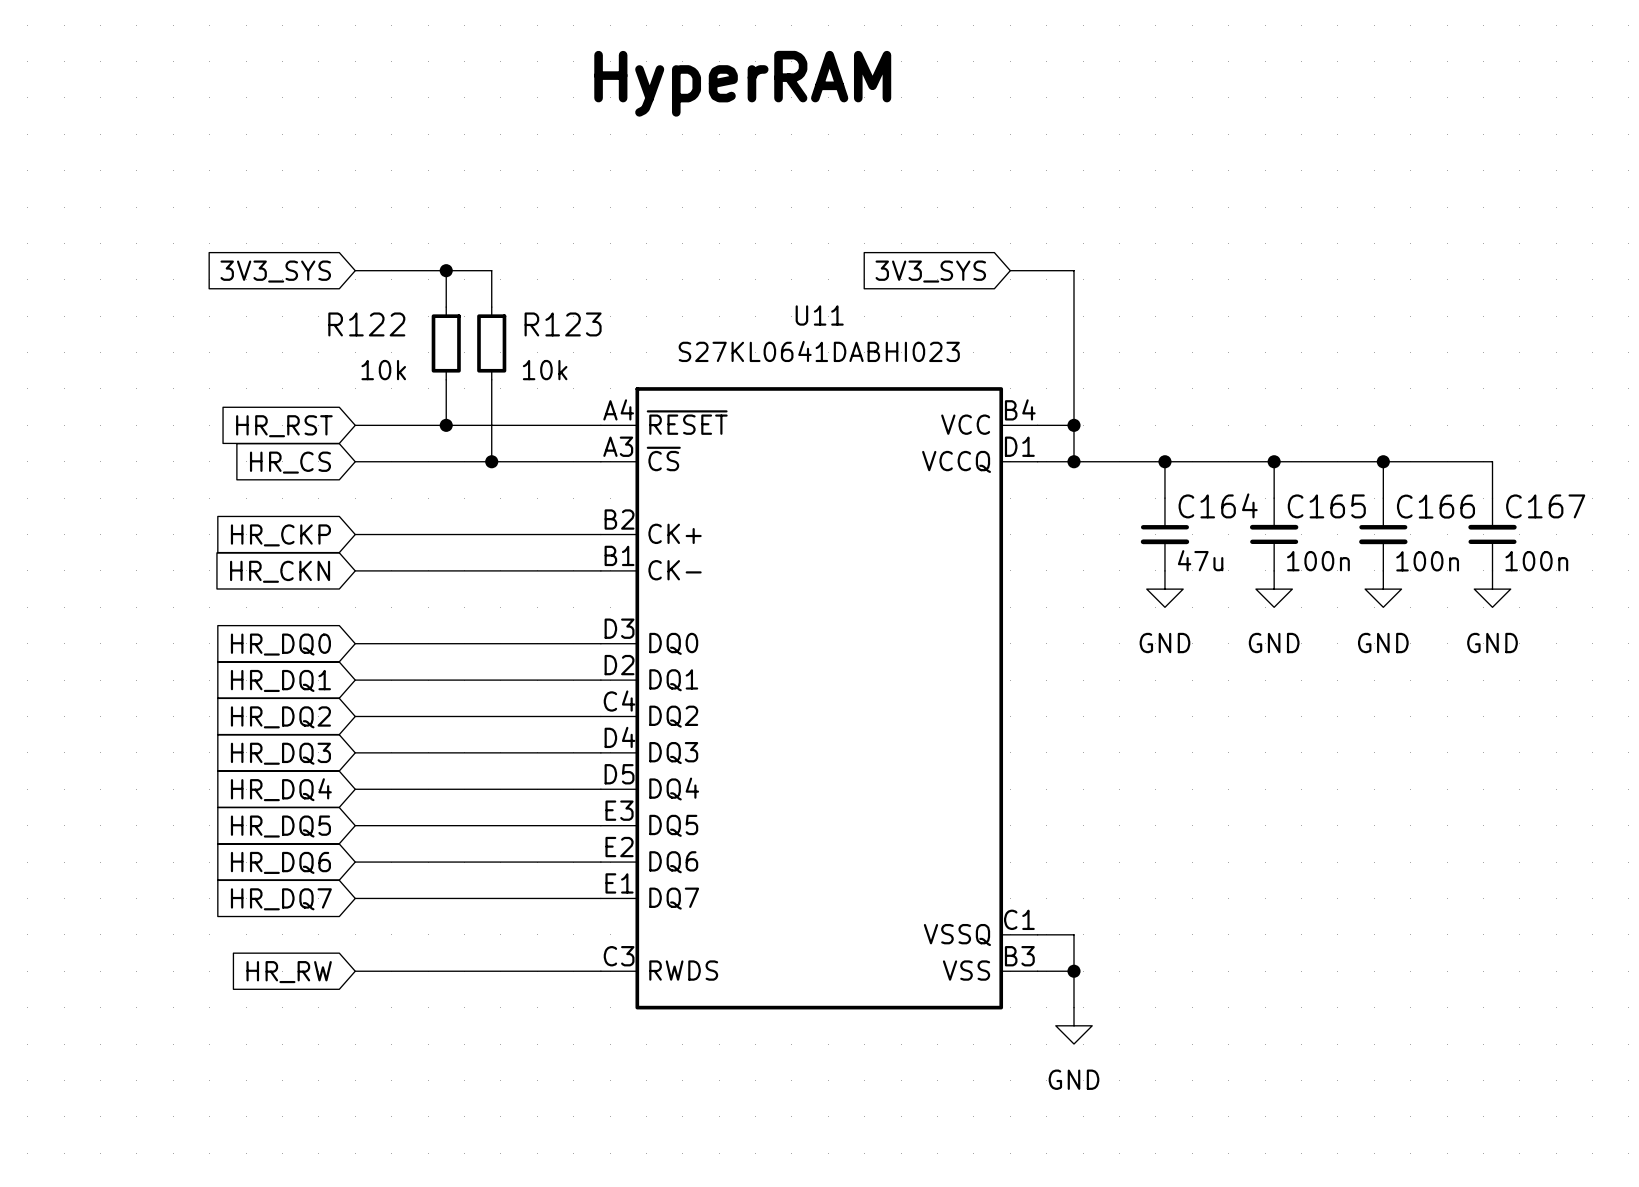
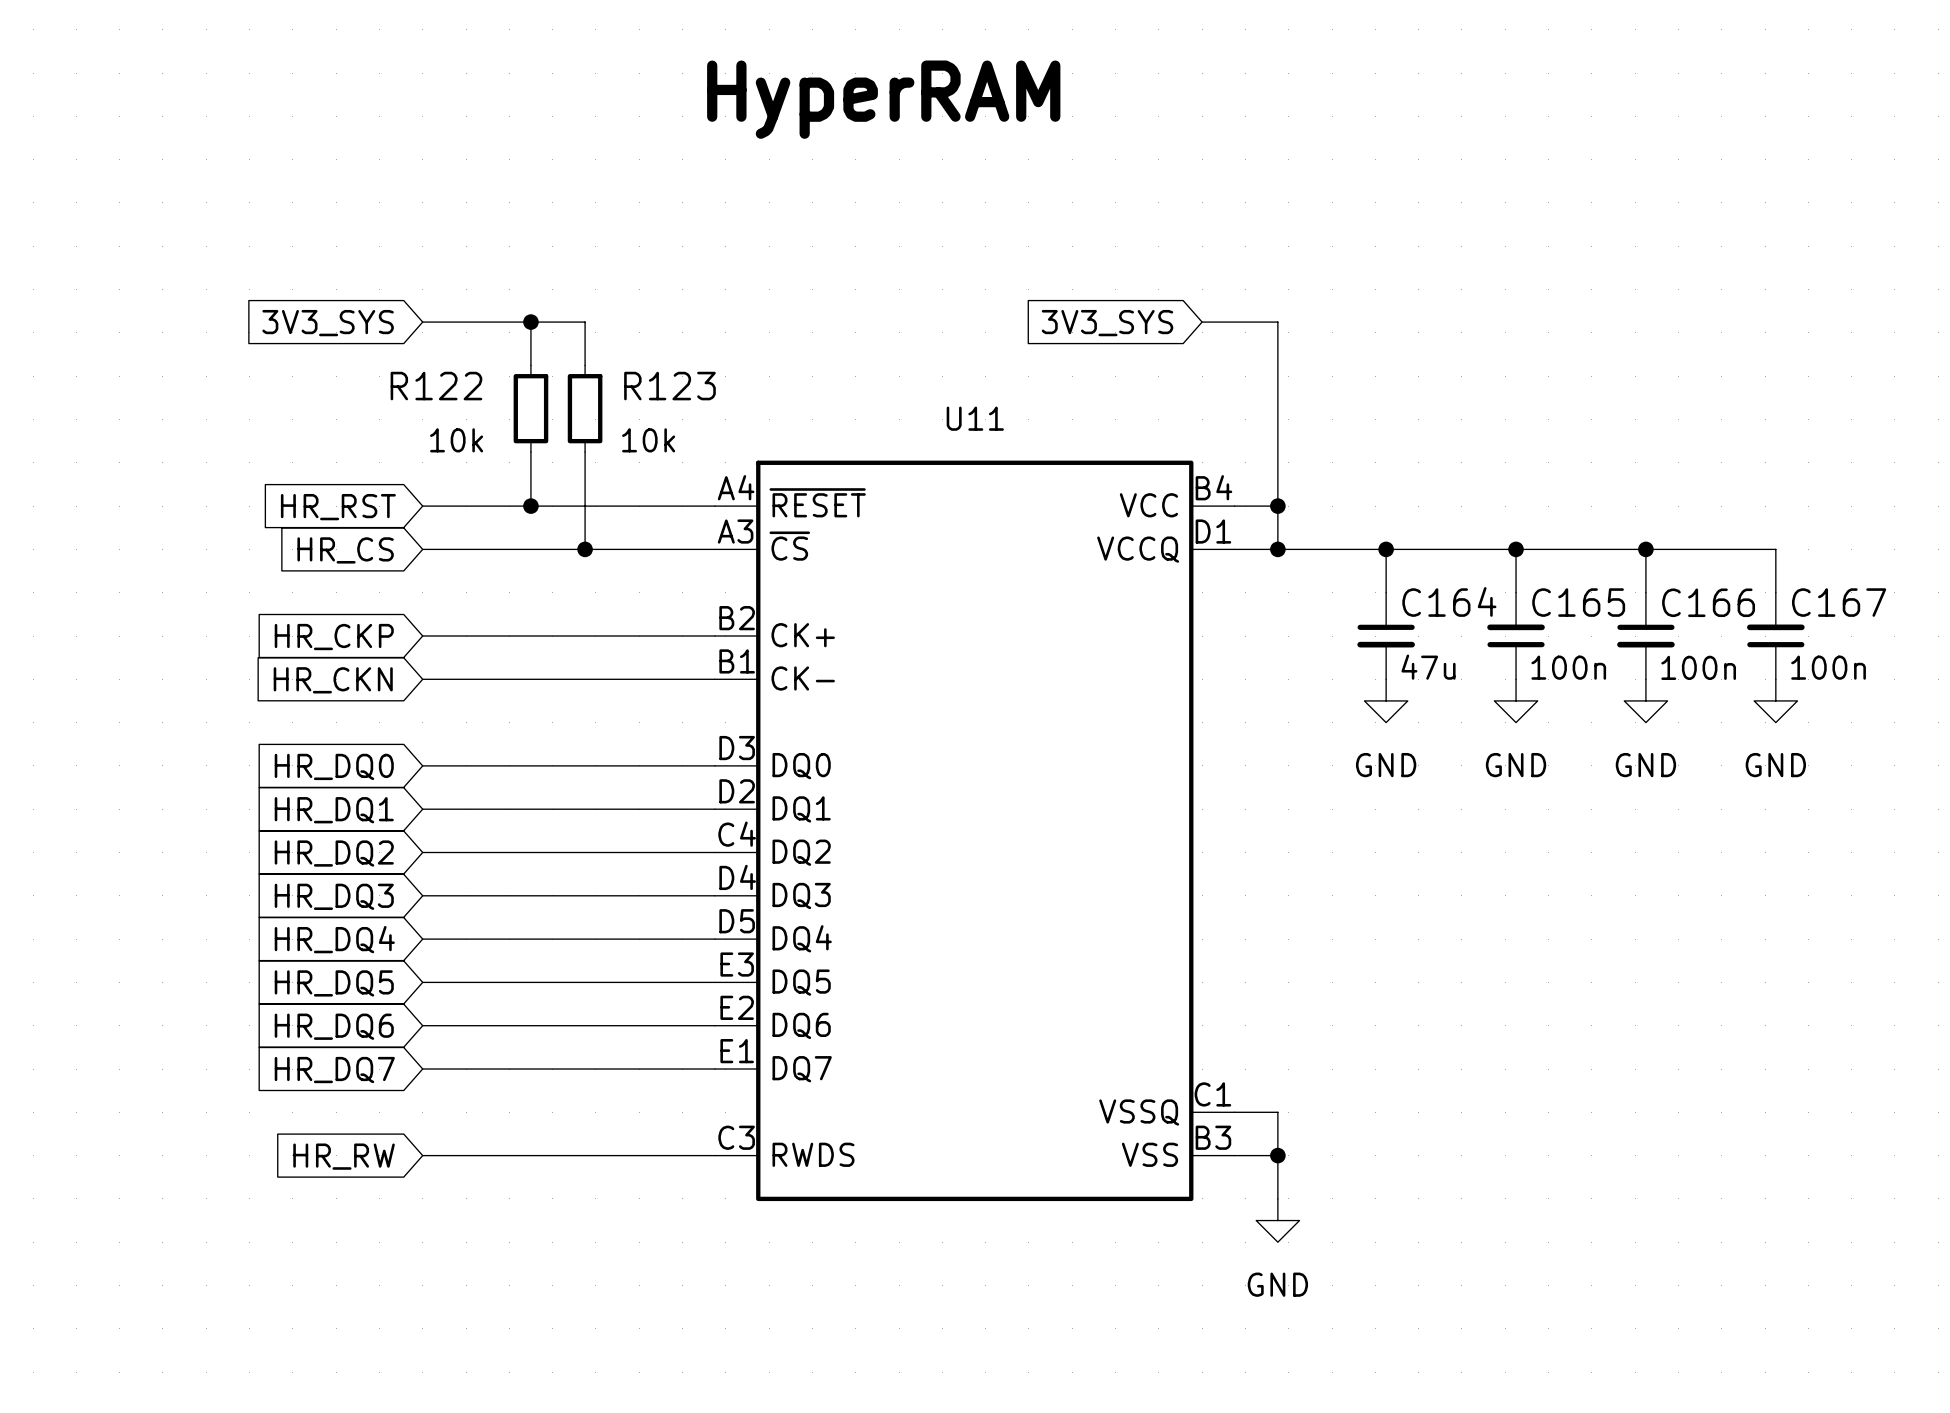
U11 name position: U11 (819, 315) -> U11 (975, 418)
U11 text: S27KL0641DABHI023 (819, 351) -> none

